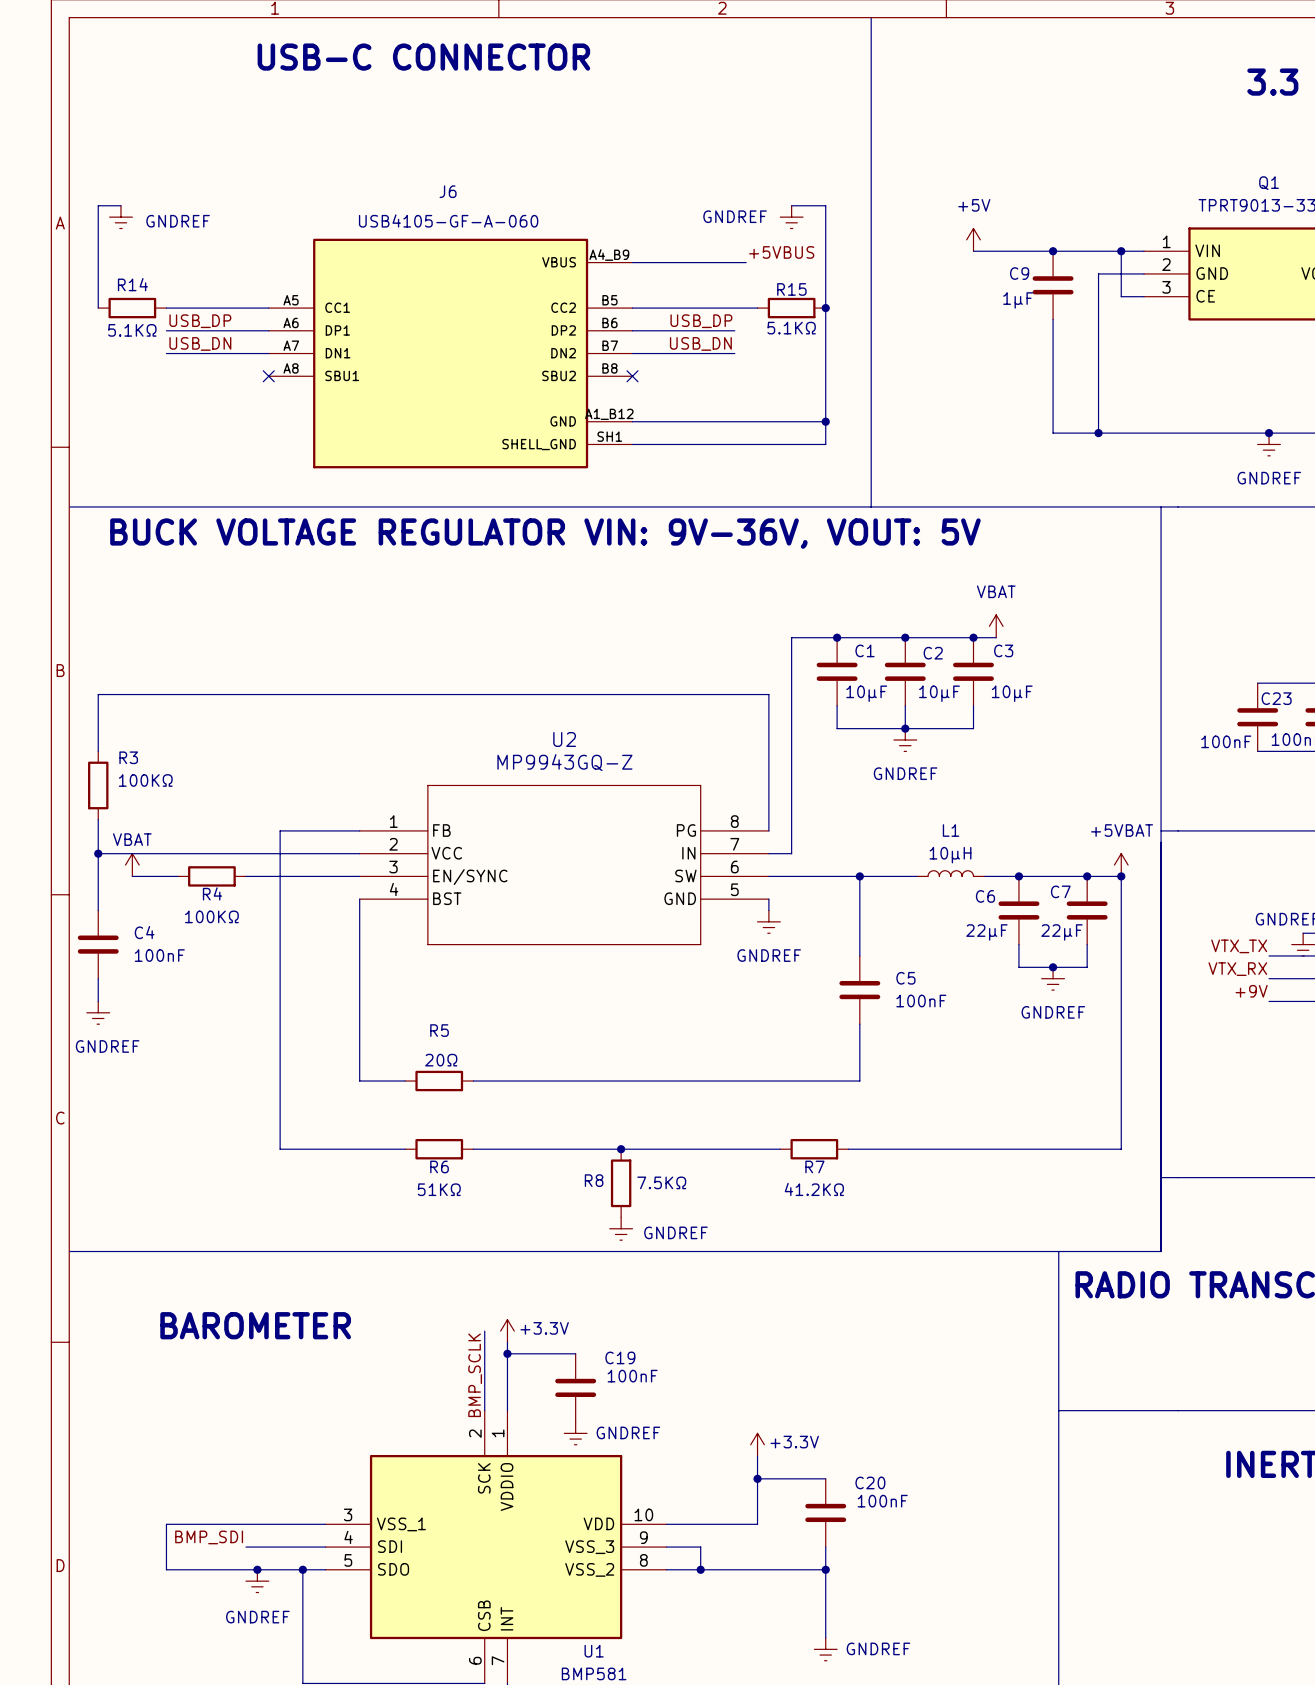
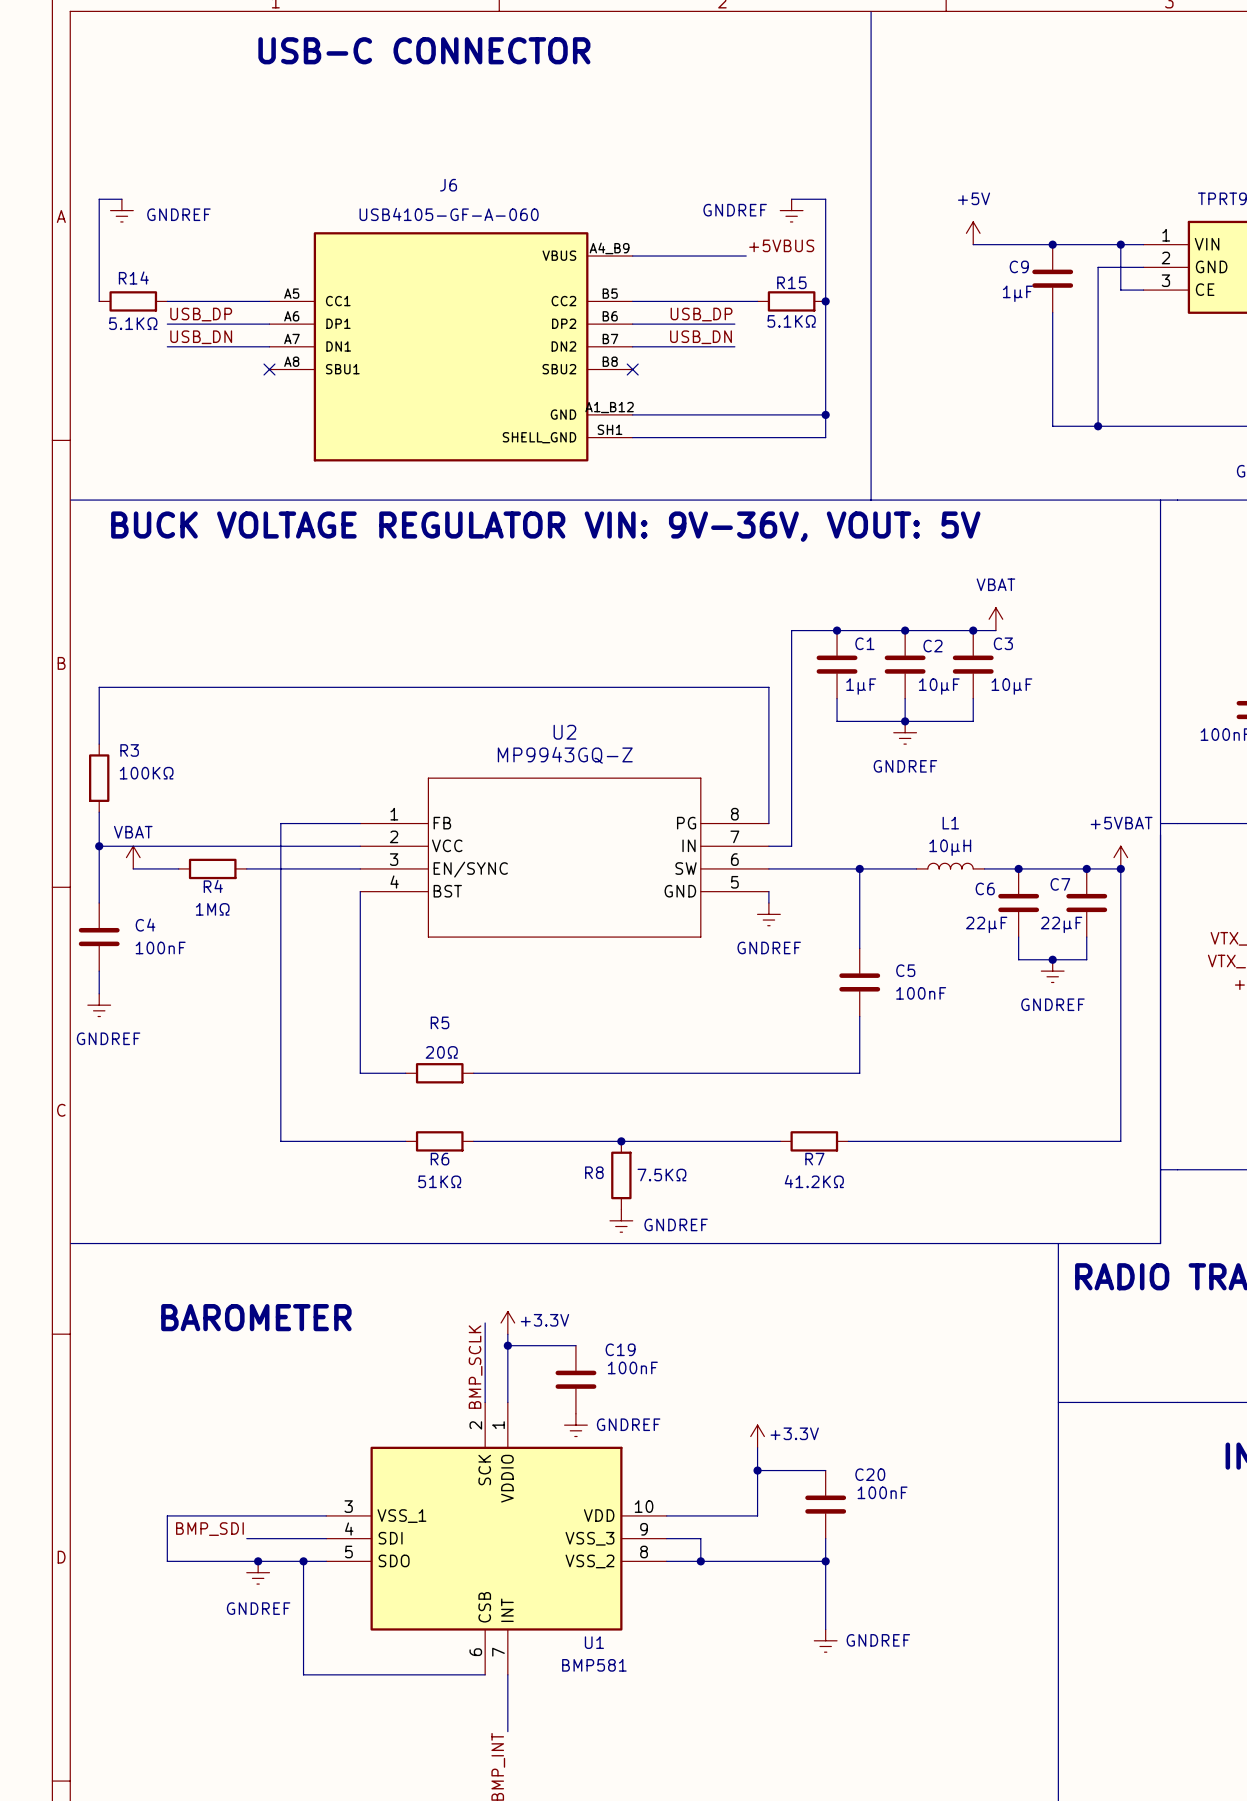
C1 value: 10μF (866, 693) -> 1μF (861, 686)
R4 value: 100KΩ (211, 916) -> 1MΩ (212, 909)

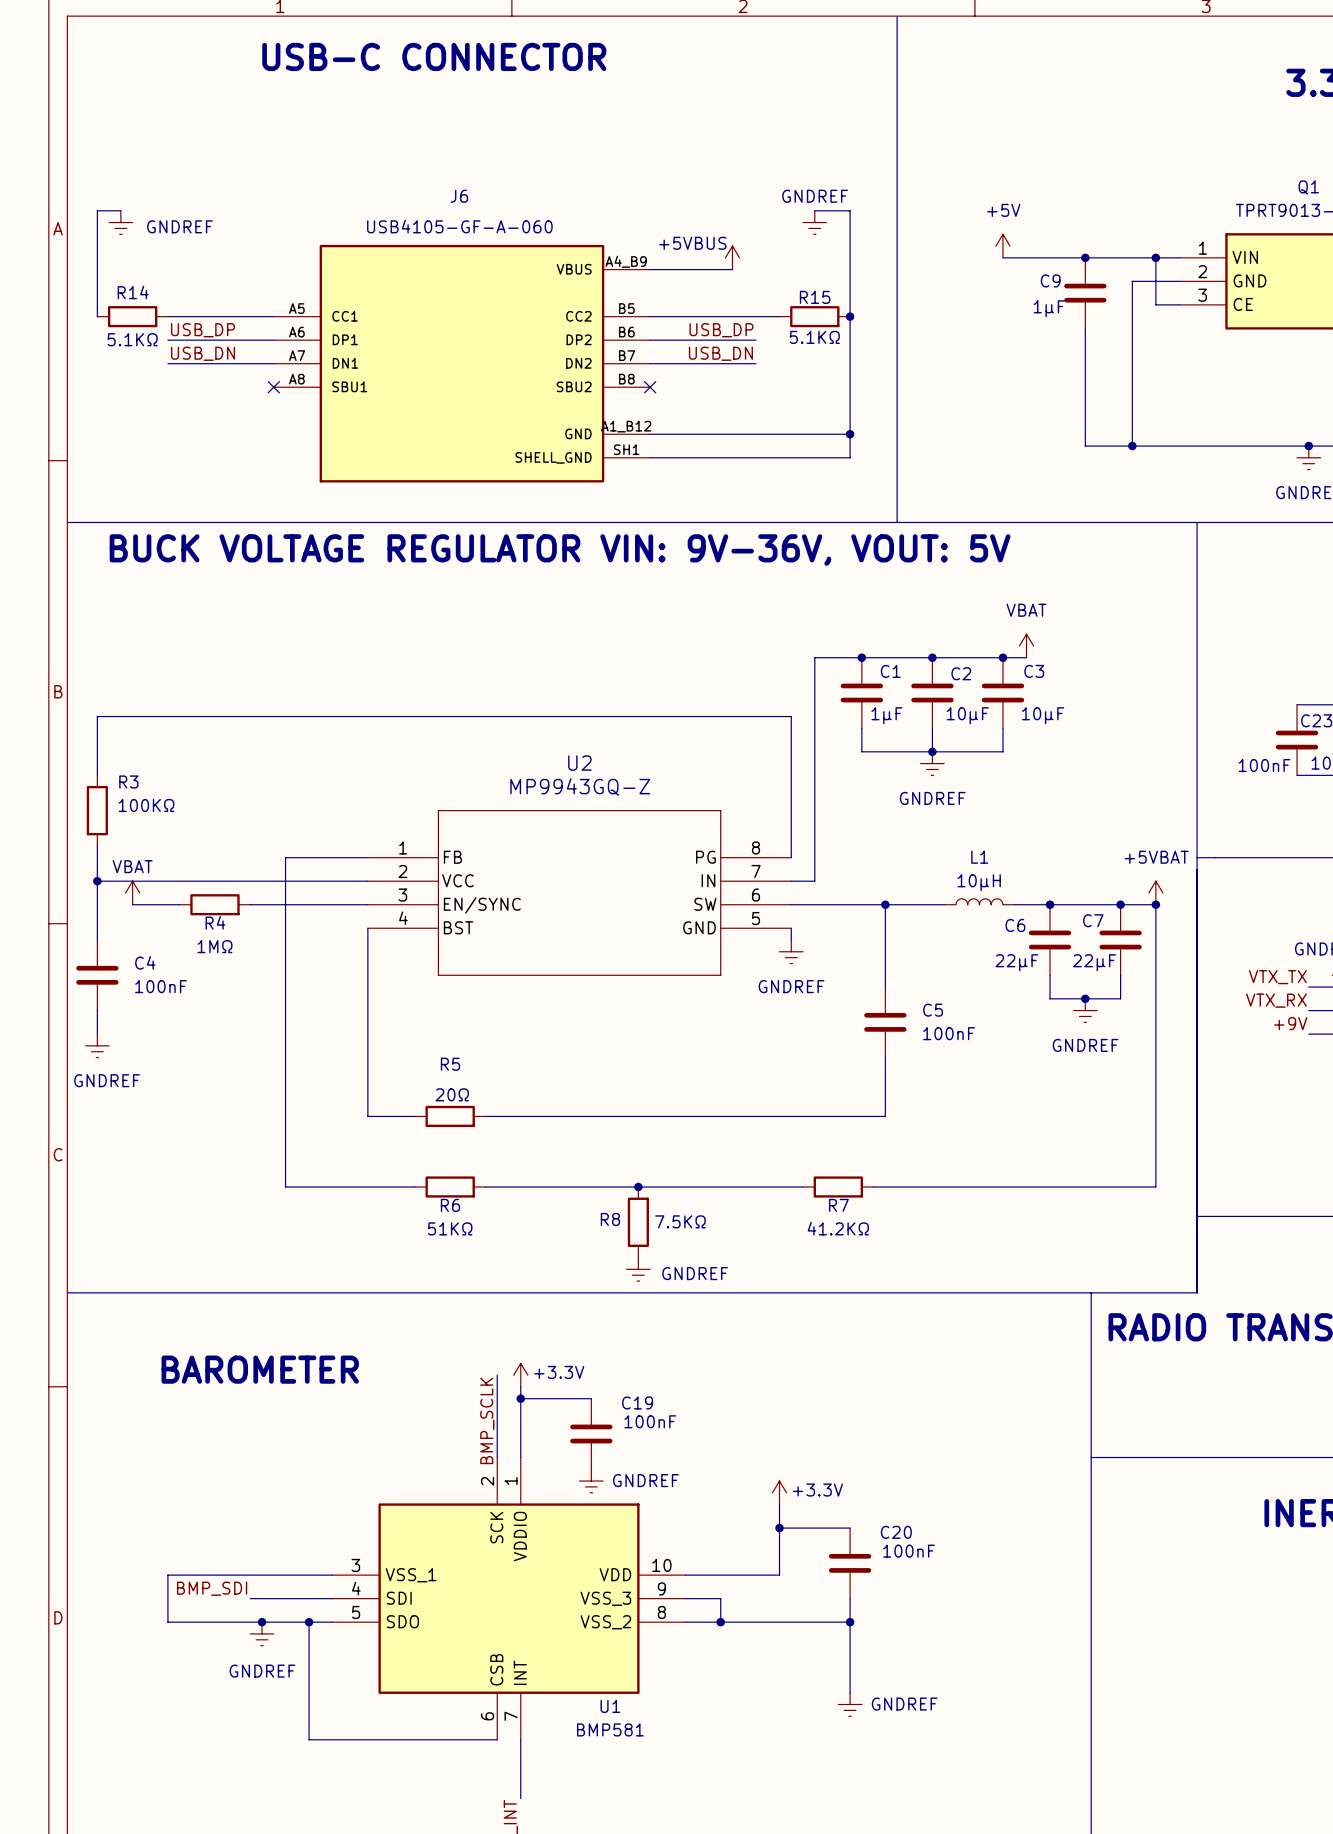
power symbol text position: GNDREF (735, 210) -> GNDREF (815, 196)
power symbol: none -> +5VBUS (732, 257)
label: +5VBUS (781, 245) -> none
wire: (712, 256) (746, 256) -> none

